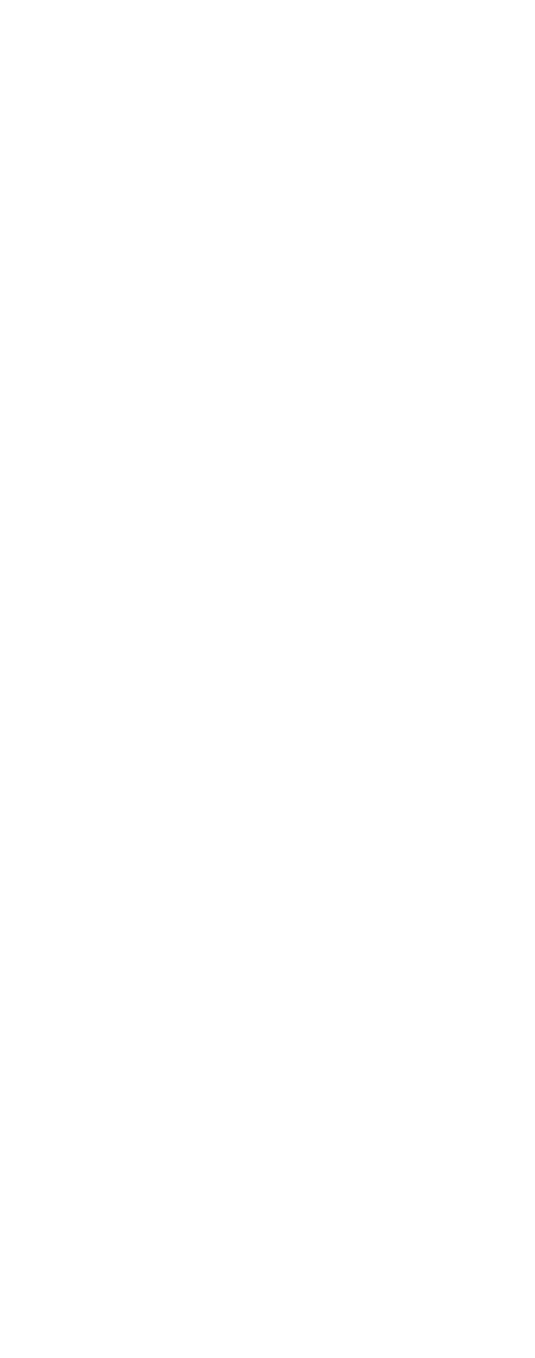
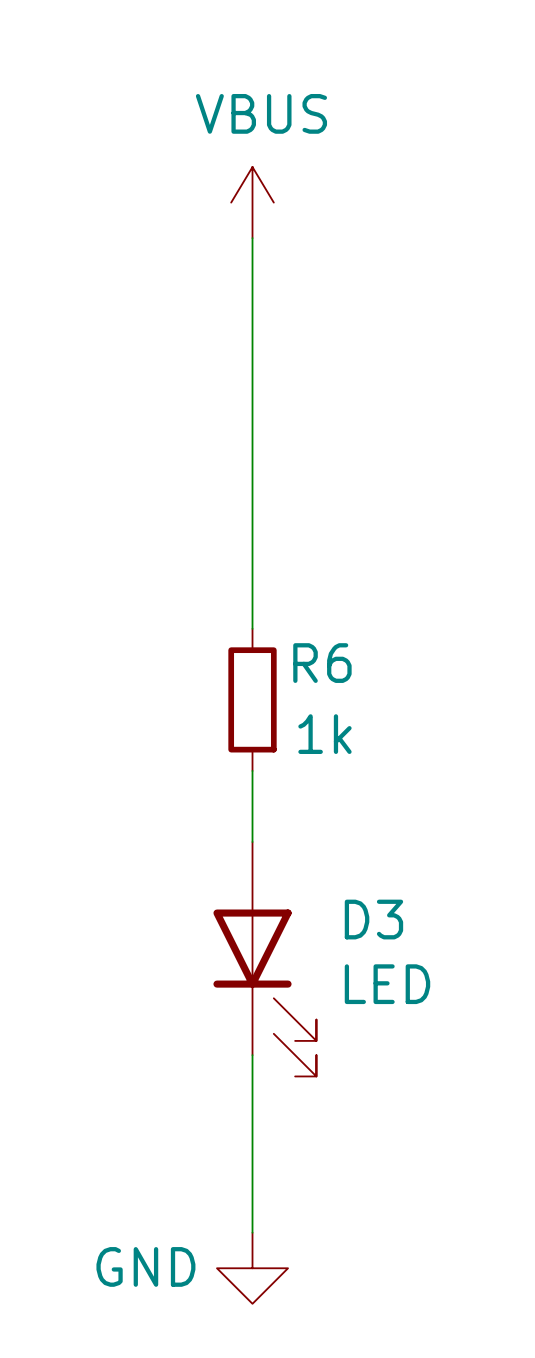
power symbol: none -> VBUS (252, 202)
wire: none -> (252, 238) (252, 628)
R6: none -> 1k (252, 699)
wire: none -> (252, 770) (252, 842)
D3: none -> LED (264, 959)
wire: none -> (252, 1055) (252, 1232)
power symbol: none -> GND (252, 1268)

